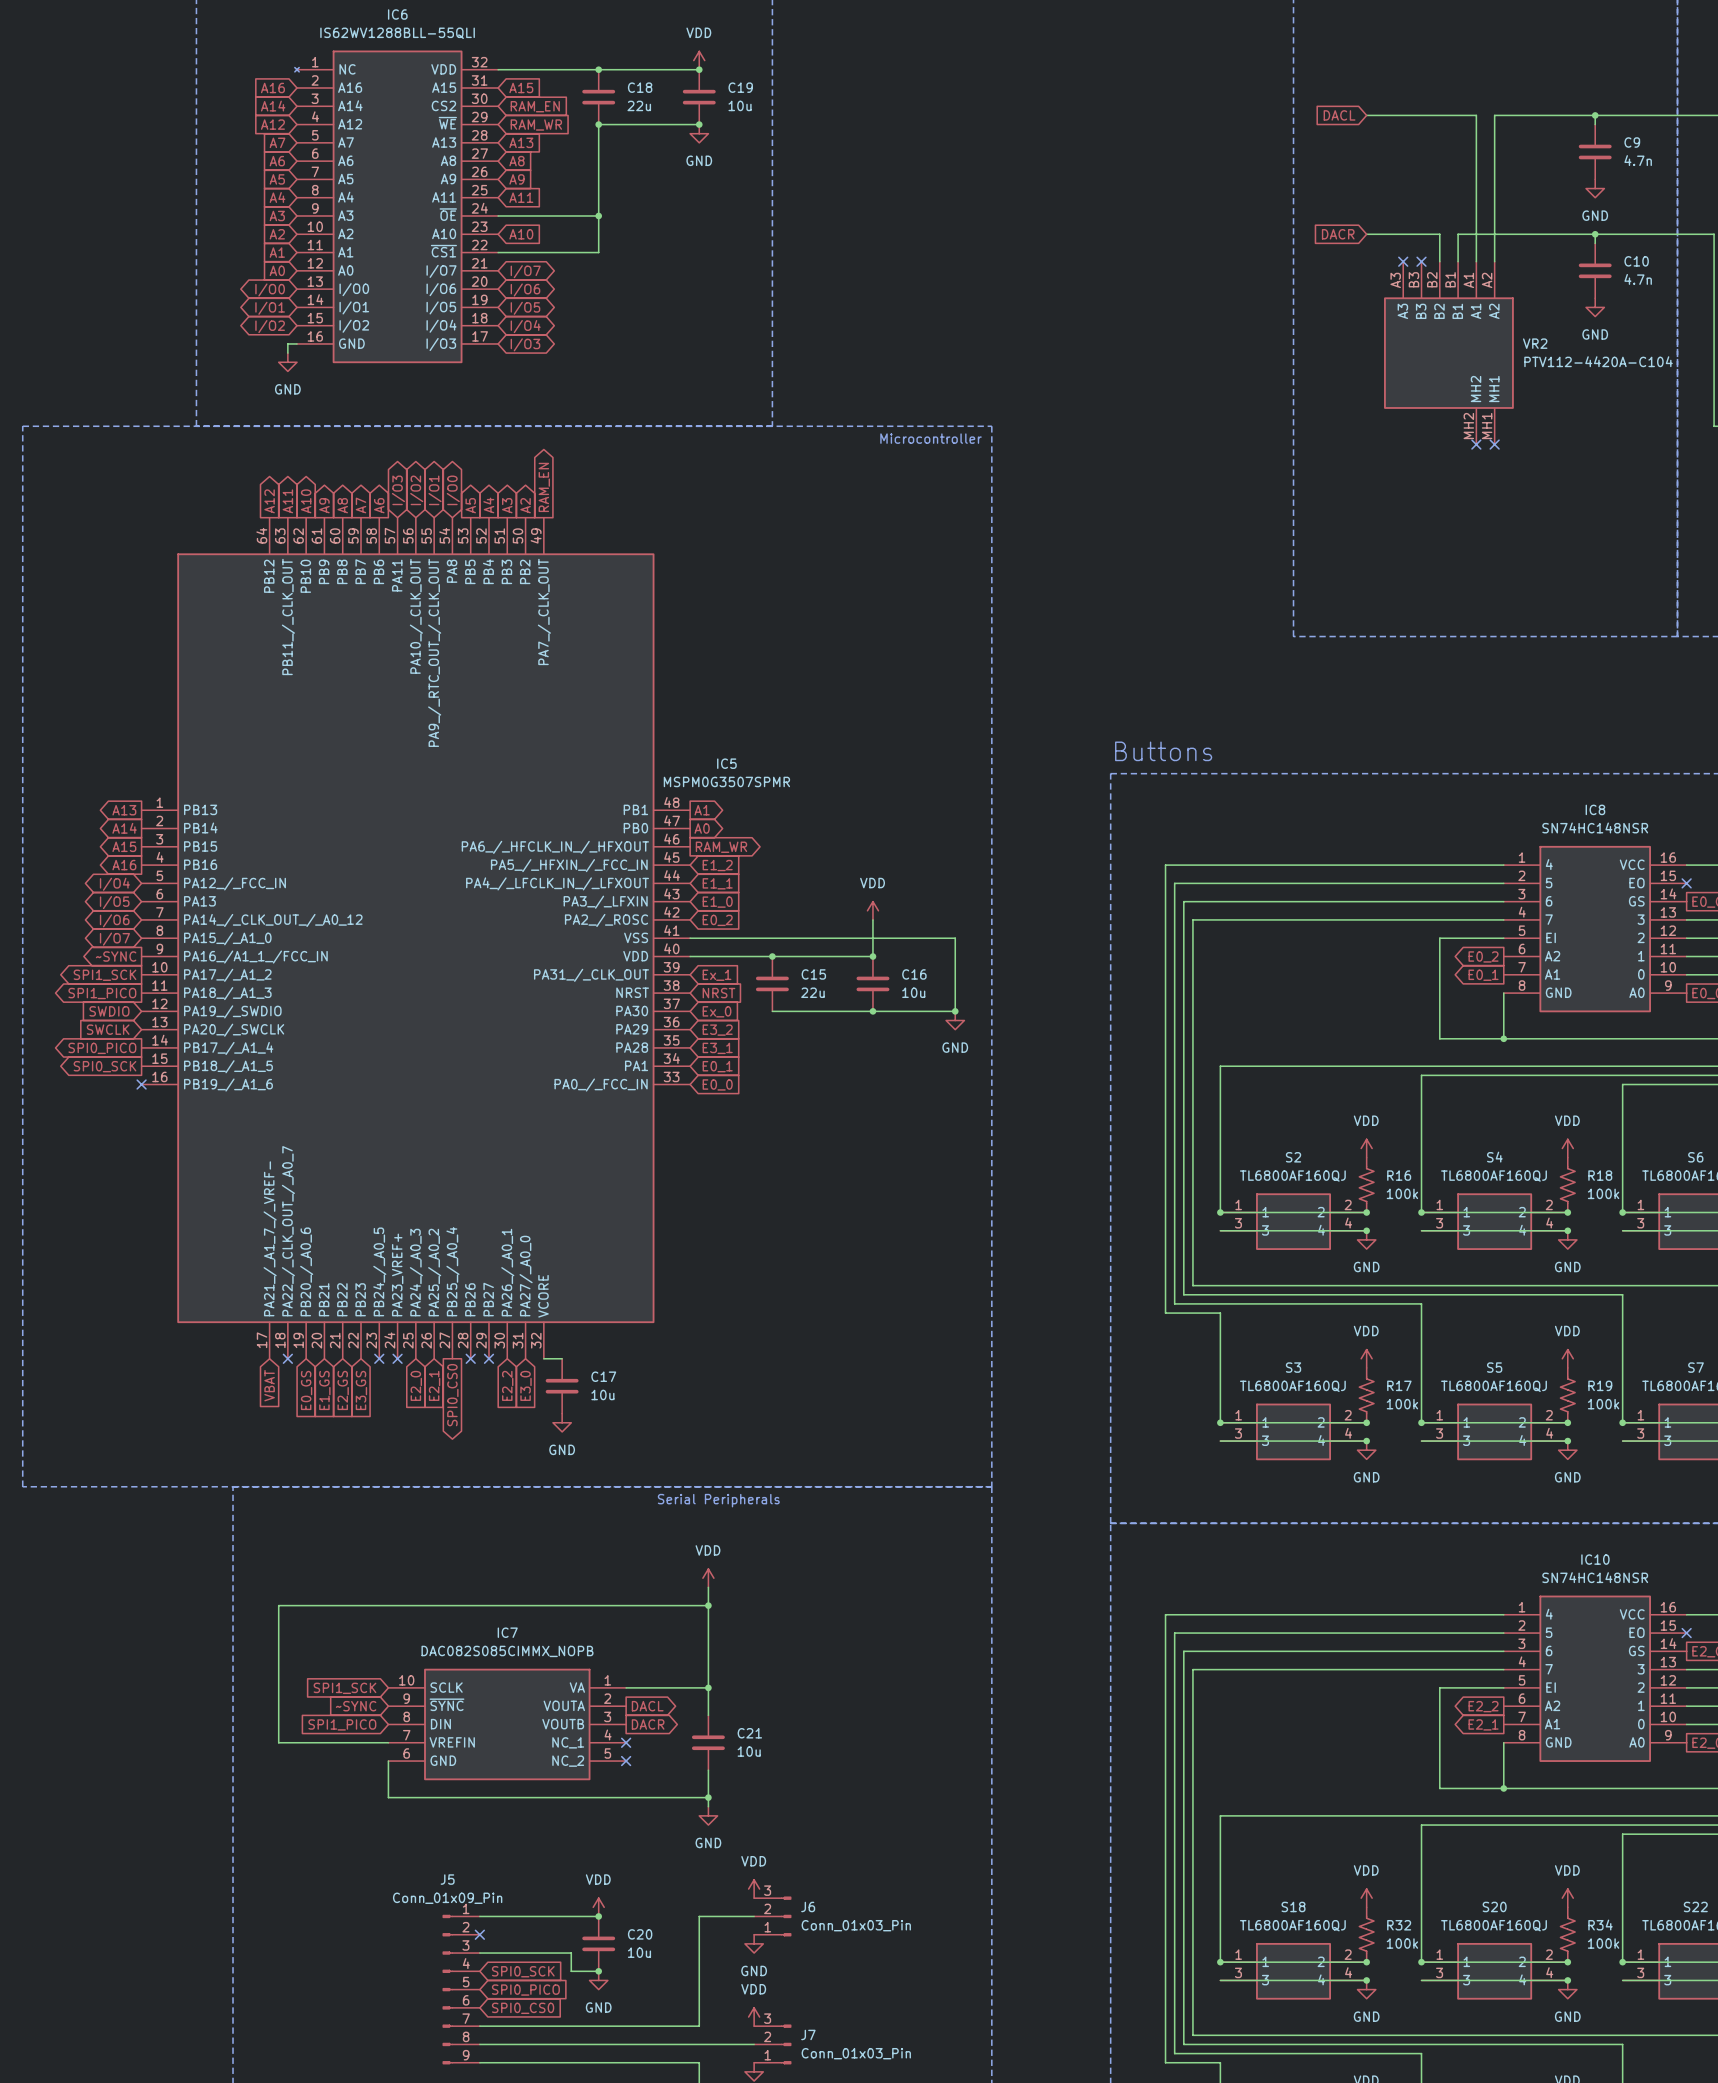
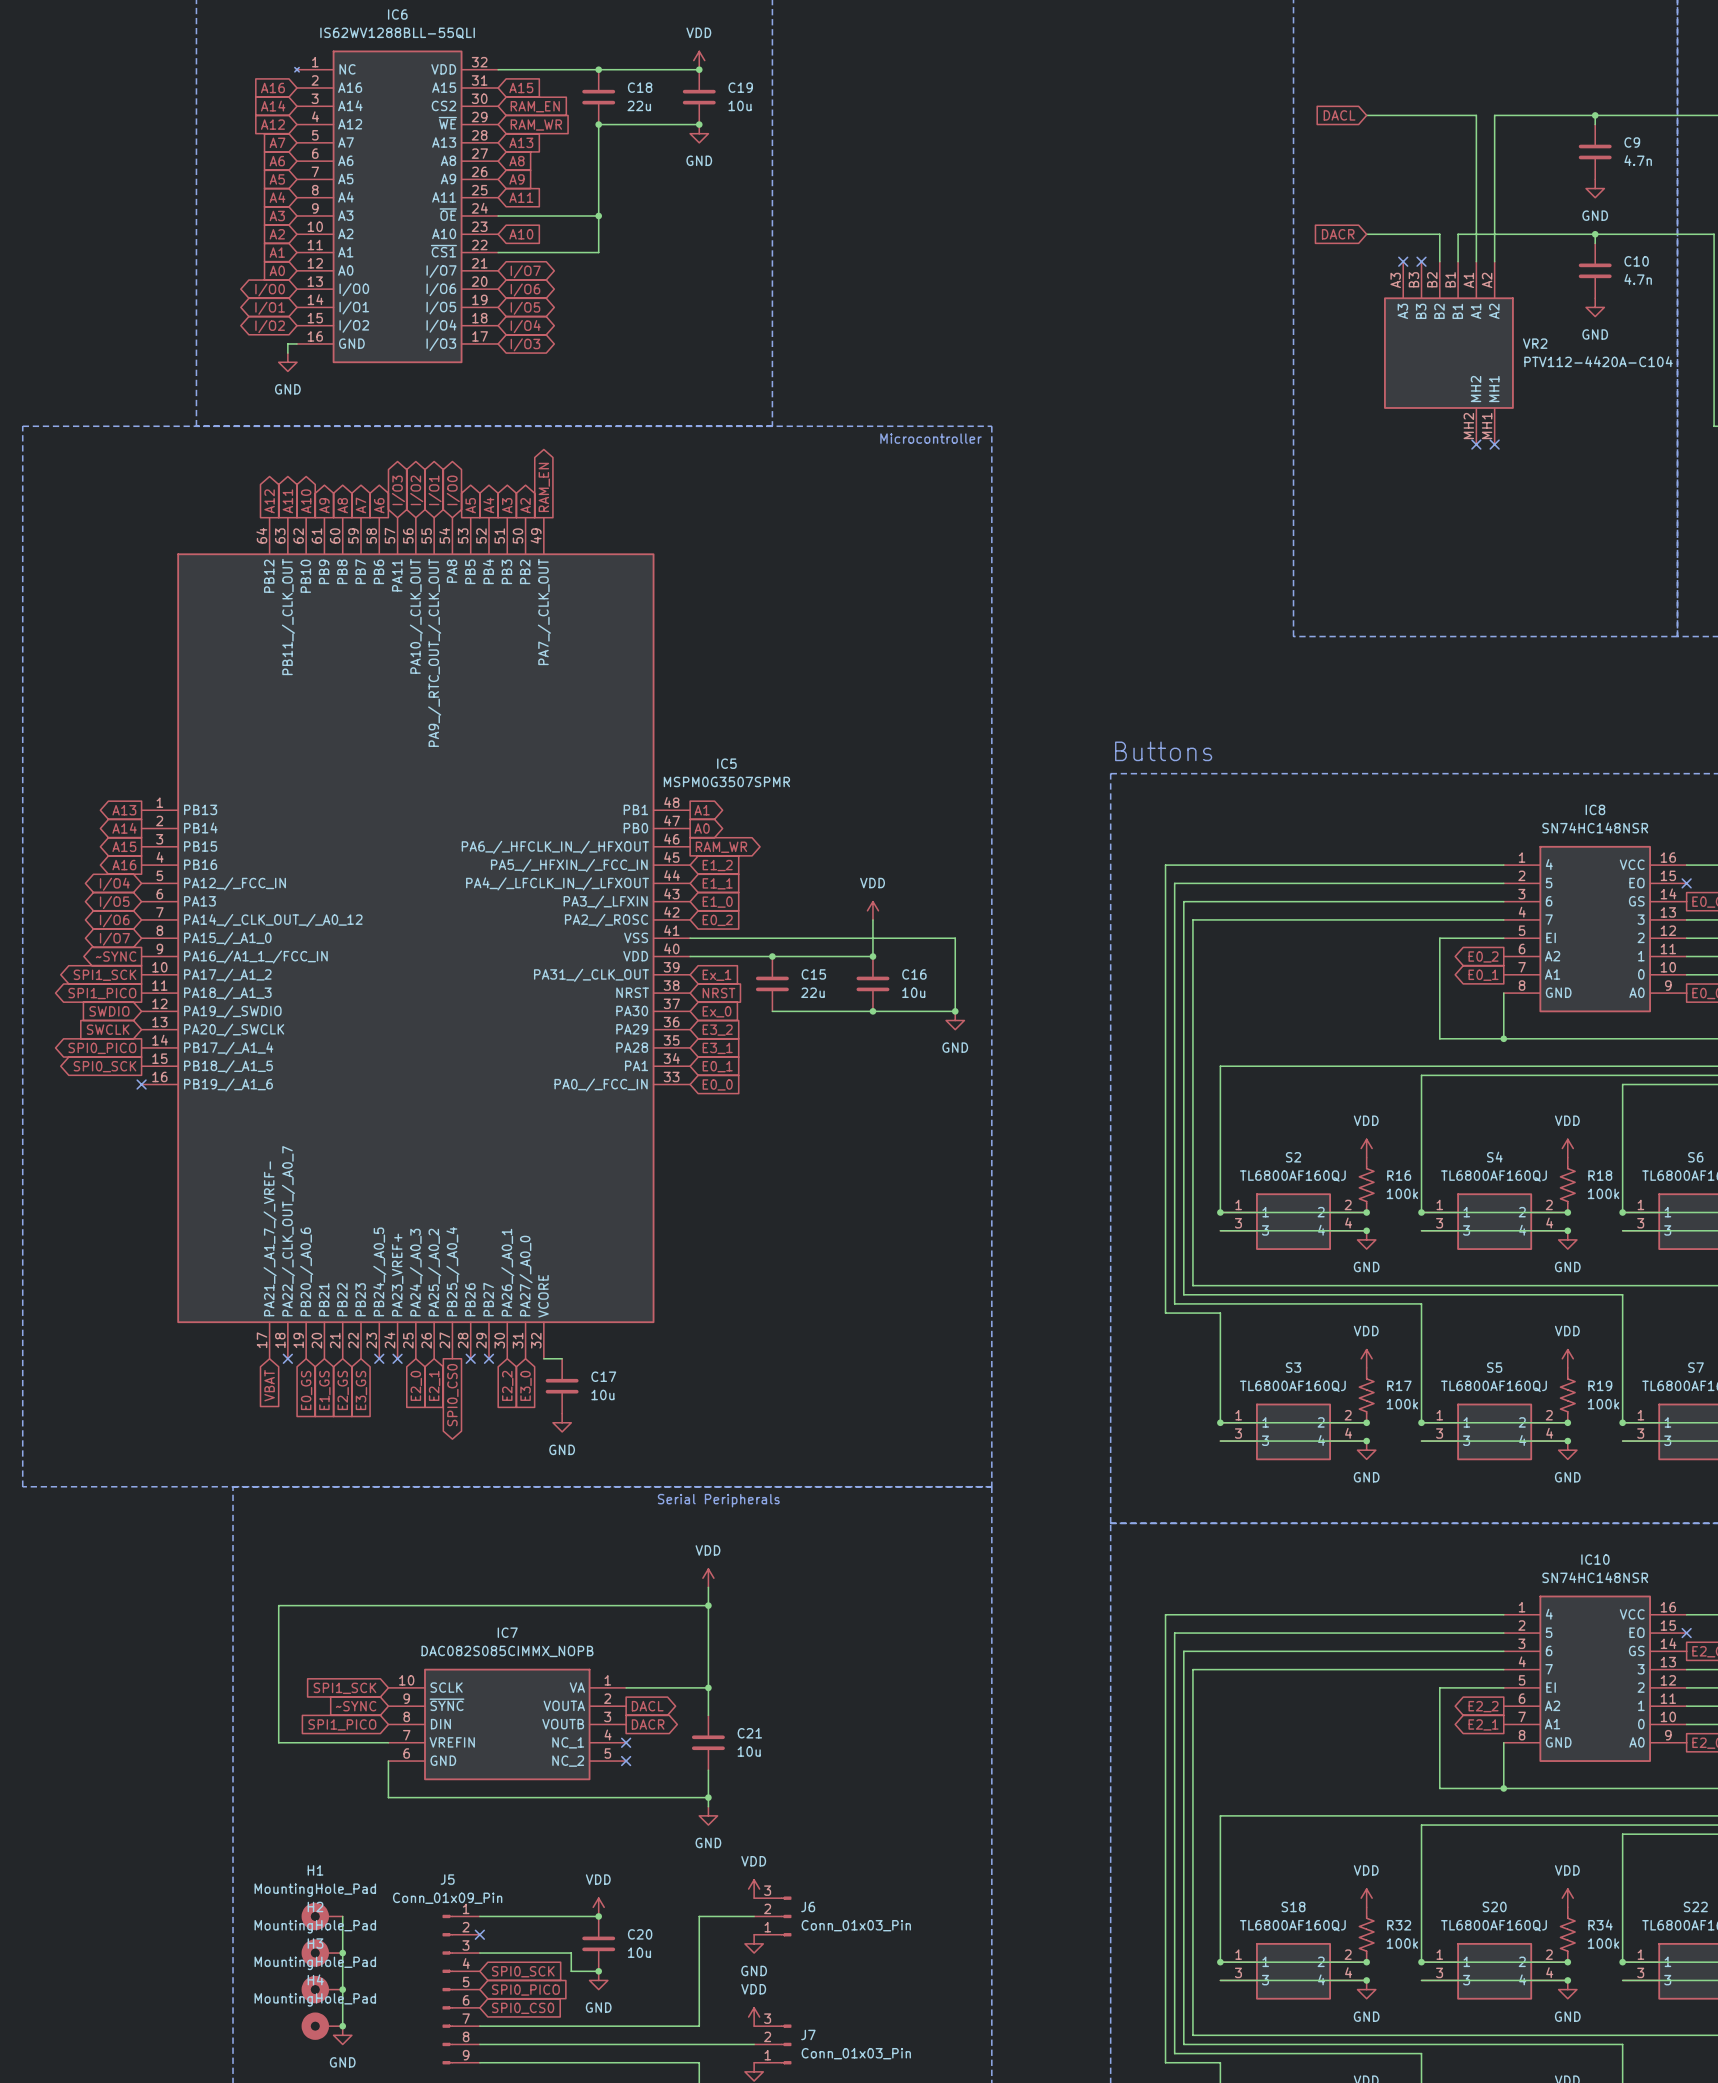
H1: none -> MountingHole_Pad (322, 1916)
wire: none -> (342, 1916) (342, 2026)
H2: none -> MountingHole_Pad (322, 1953)
junction: none -> (342, 1953)
H3: none -> MountingHole_Pad (322, 1989)
junction: none -> (342, 1989)
H4: none -> MountingHole_Pad (322, 2026)
junction: none -> (342, 2026)
power symbol: none -> GND (342, 2035)

